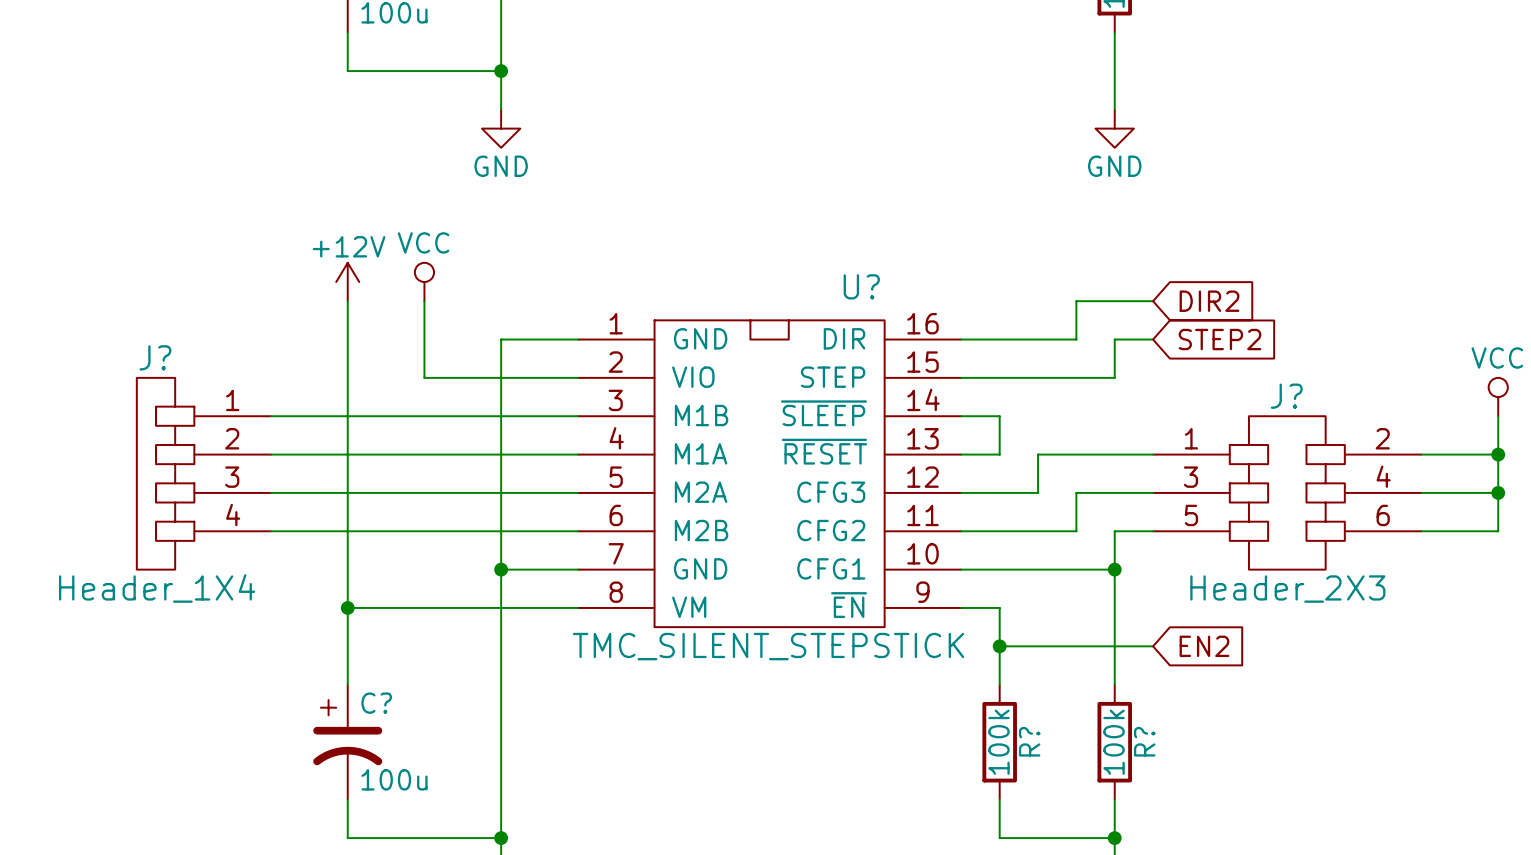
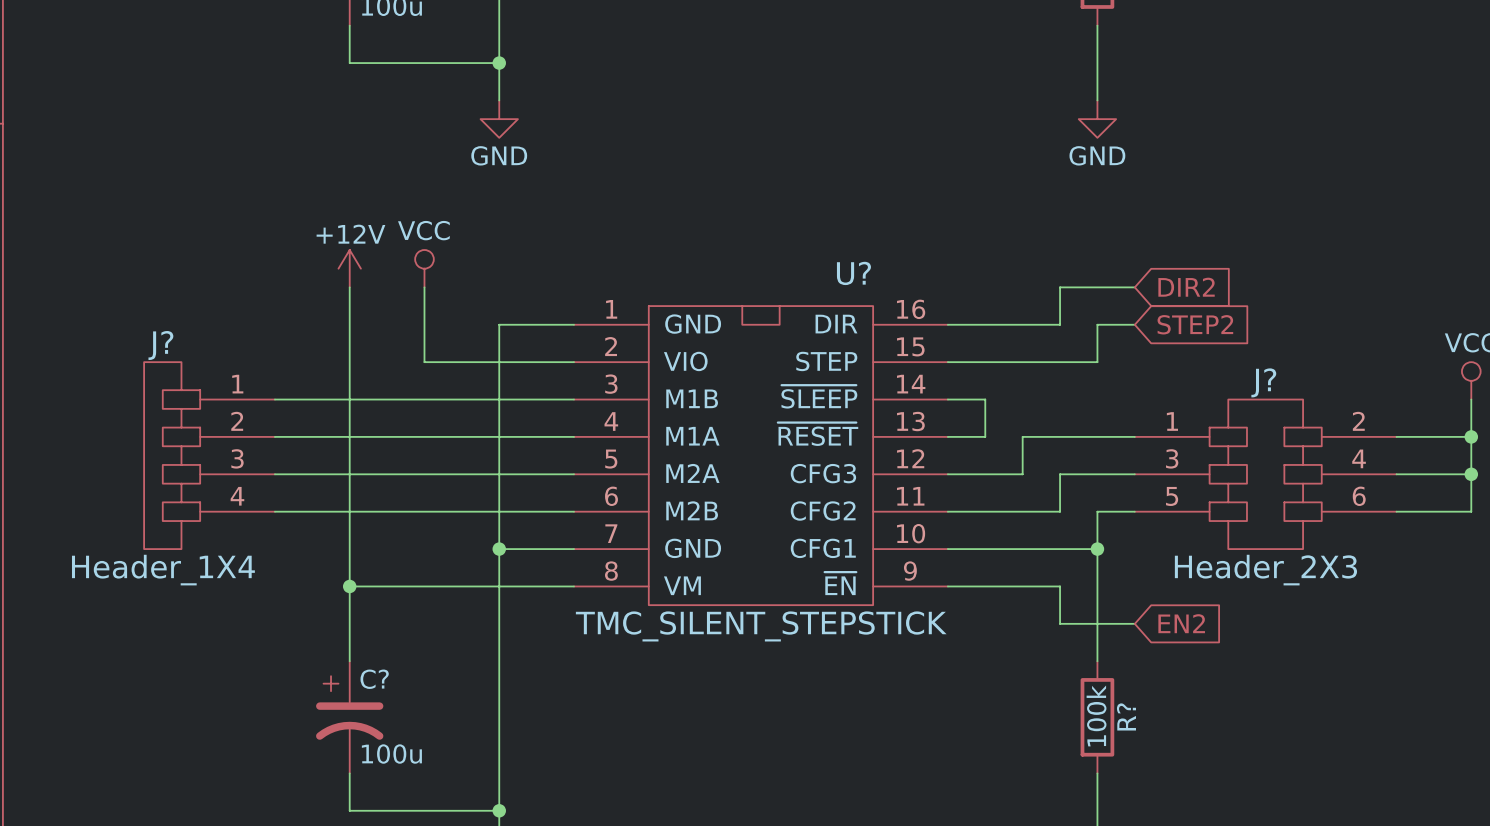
wire: (999, 607) (999, 684) -> none
wire: (999, 646) (1076, 646) -> (985, 586) (1060, 586) (1060, 623)
junction: (999, 646) -> none
R?: 100k (999, 742) -> none
wire: (999, 799) (999, 838) (1114, 838) -> none
junction: (1114, 838) -> none

